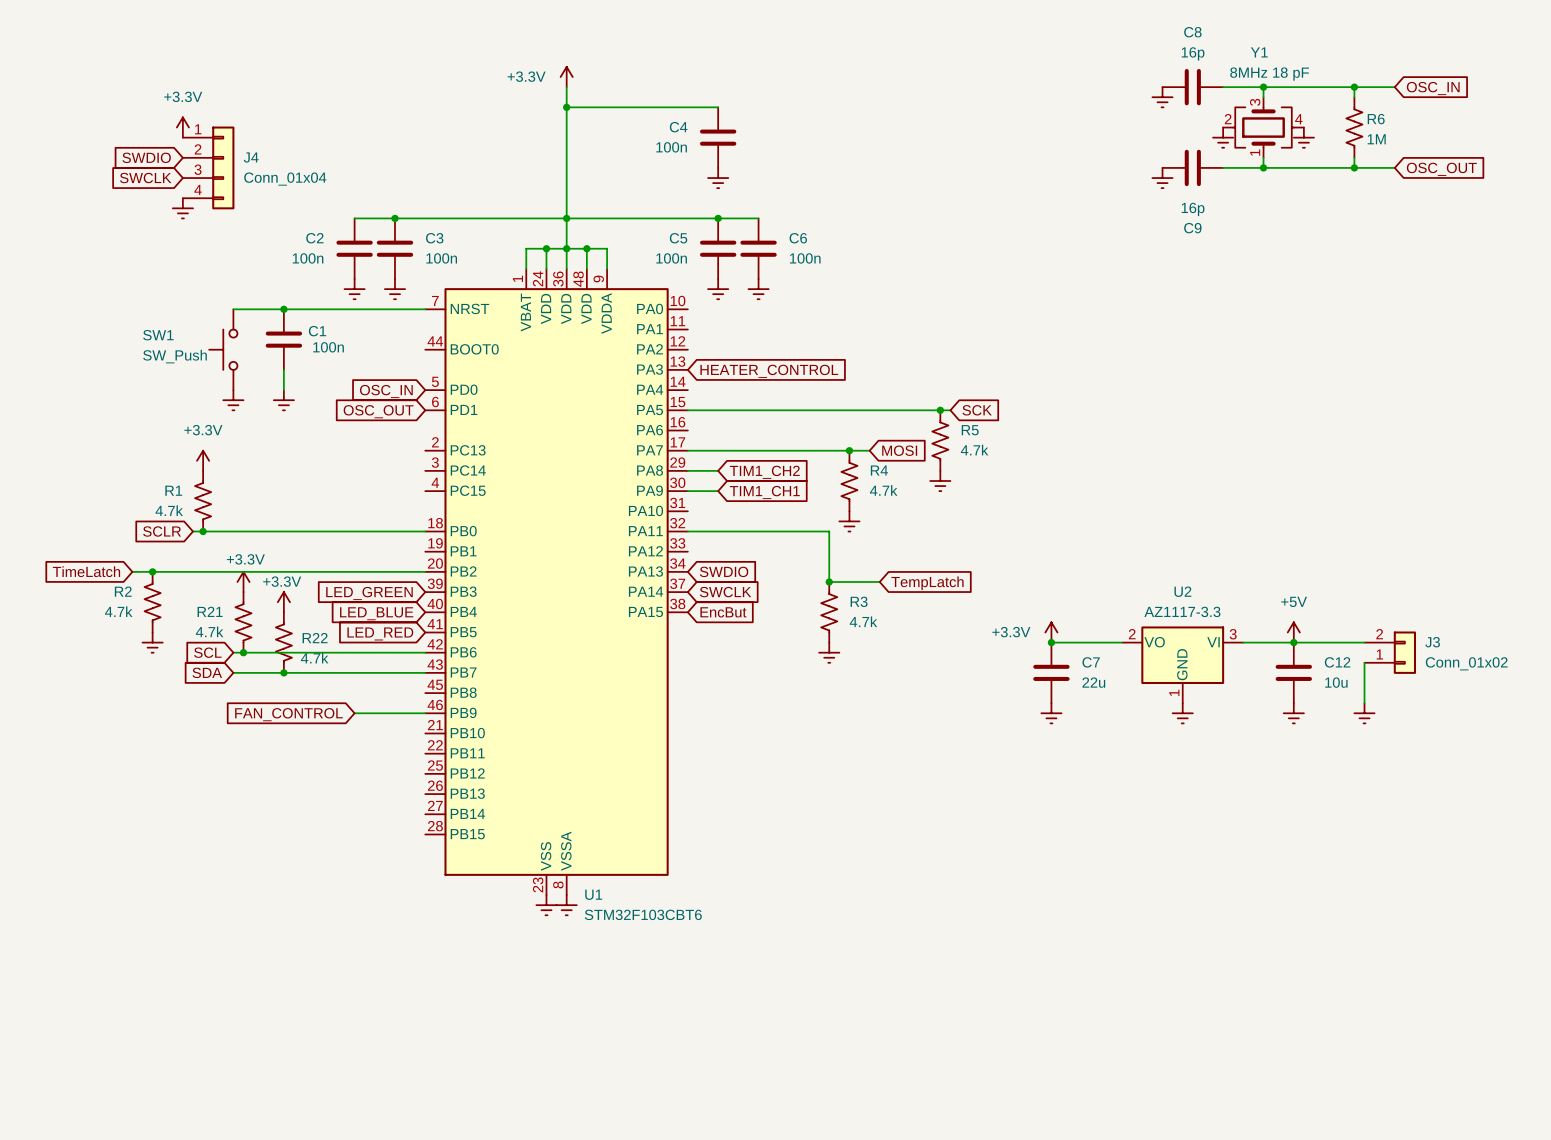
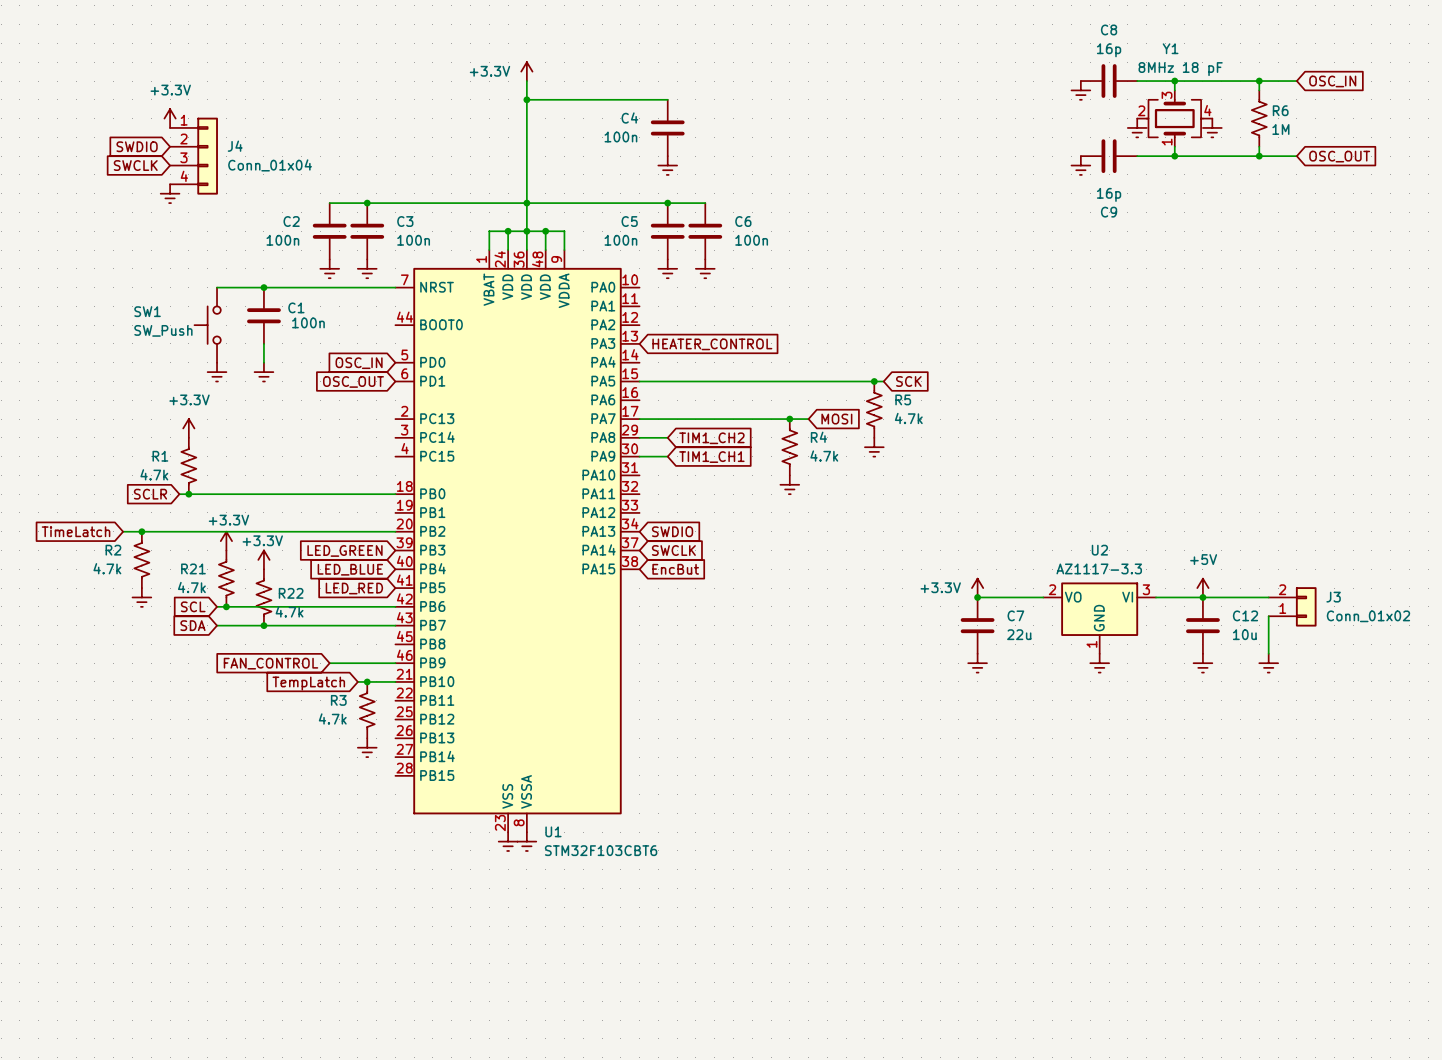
wire: (687, 531) (829, 531) (829, 582) (879, 582) -> none
junction: (829, 582) -> none
global label: TempLatch (927, 583) -> none
R3 flip: as is (829, 612) -> left-right (367, 710)
R3 position: (829, 612) -> (367, 710)
power symbol: (829, 652) -> none
wire: none -> (357, 681) (395, 681)
junction: none -> (367, 681)
global label: none -> TempLatch (308, 683)
power symbol: none -> (367, 747)

